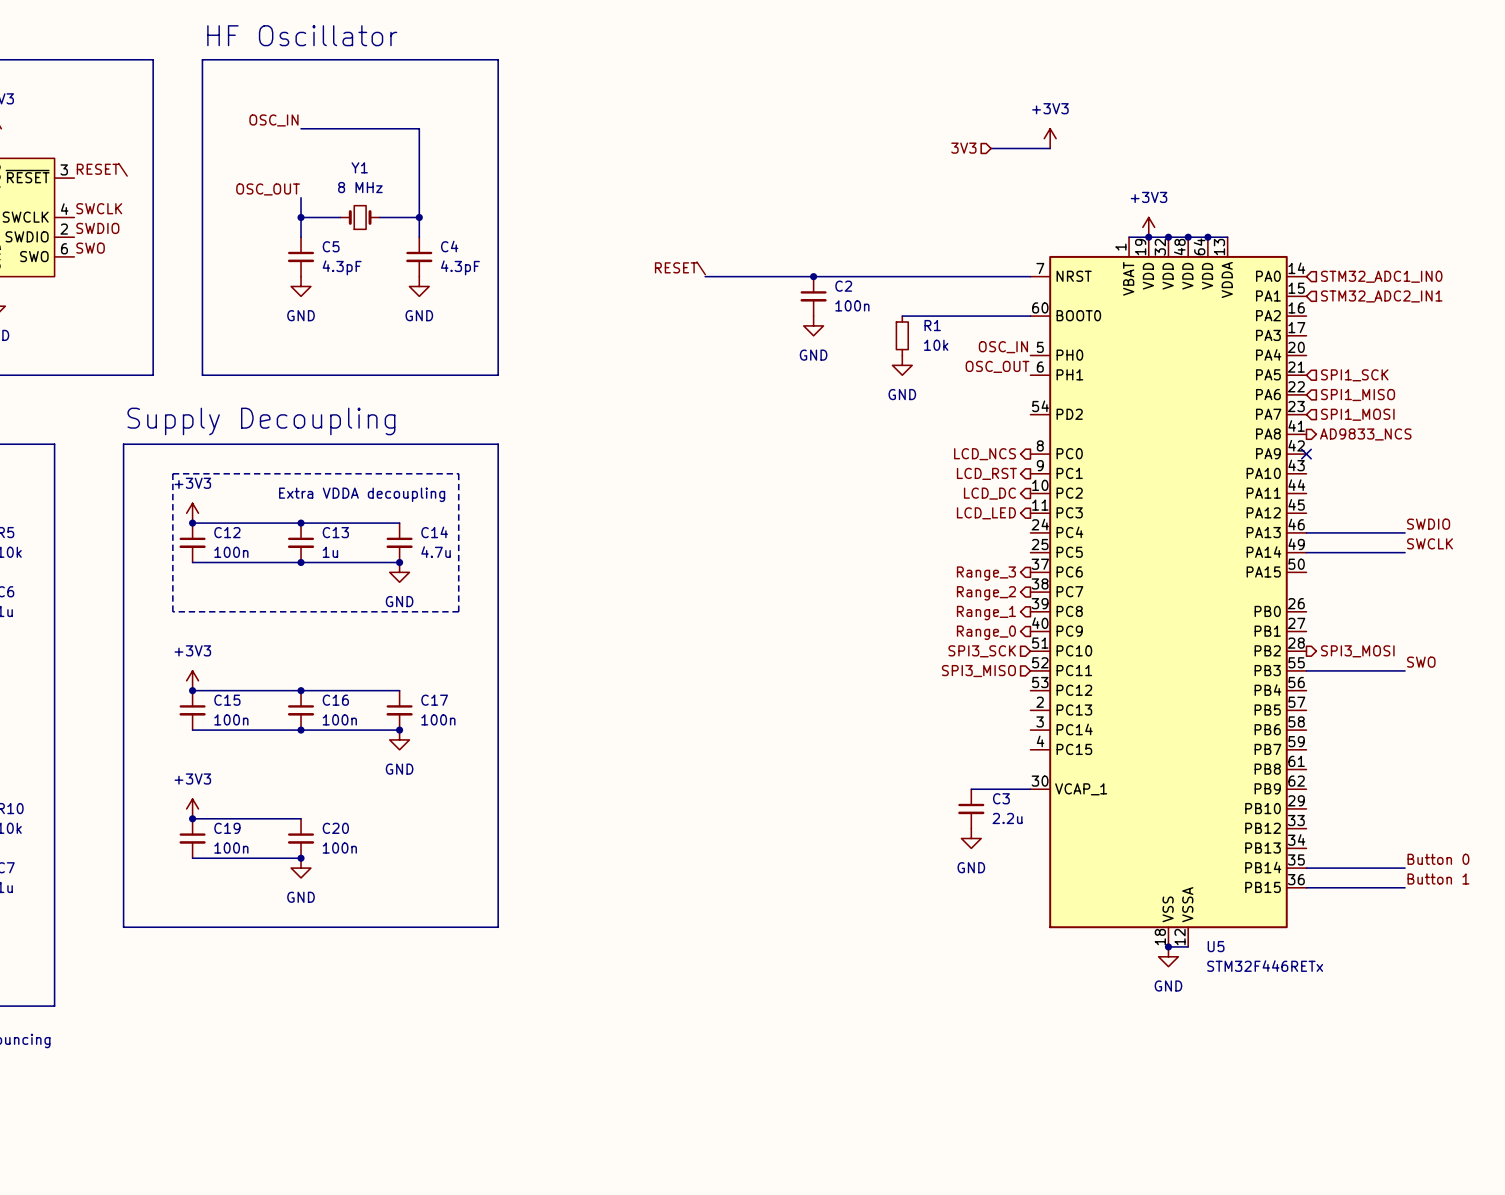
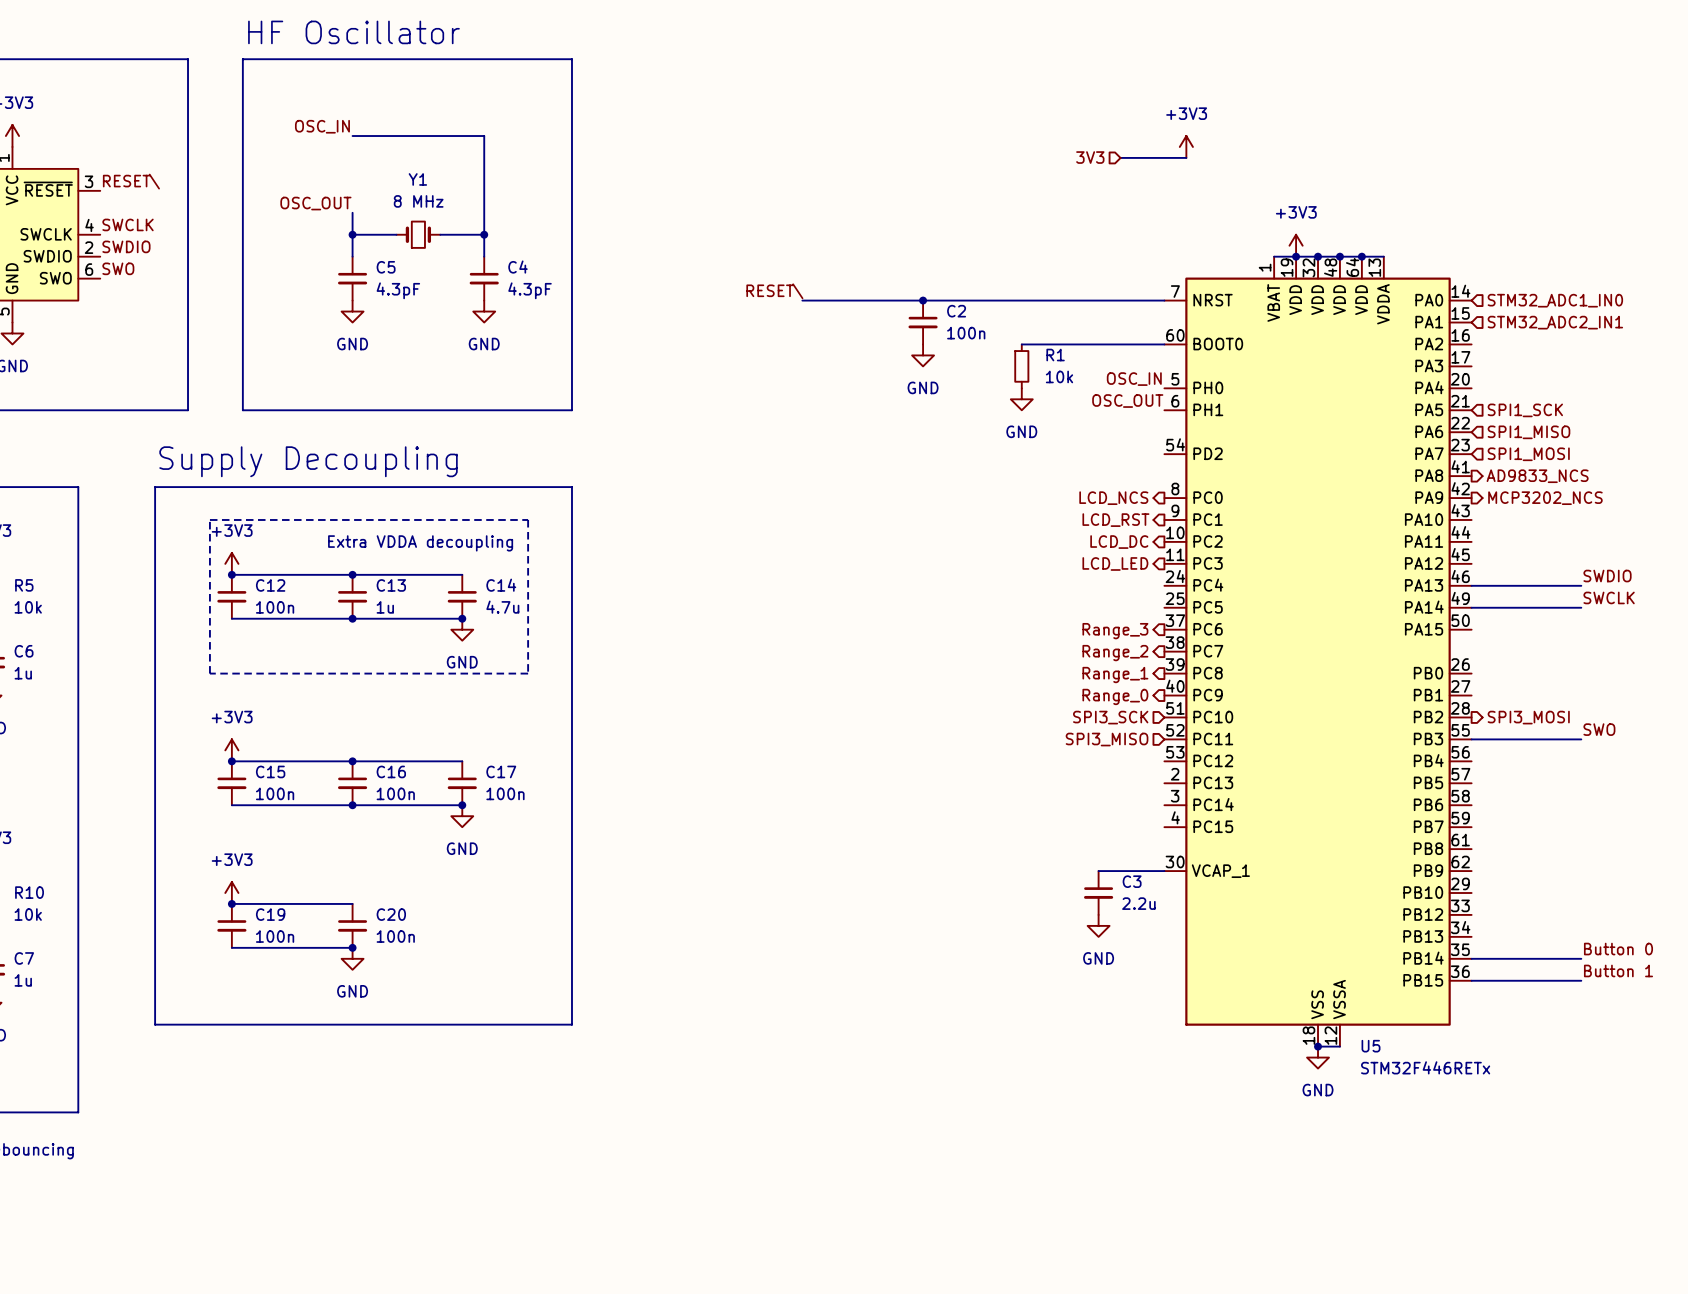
no-connect mark: (1306, 454) -> none
hierarchical label: none -> MCP3202_NCS (1545, 498)

